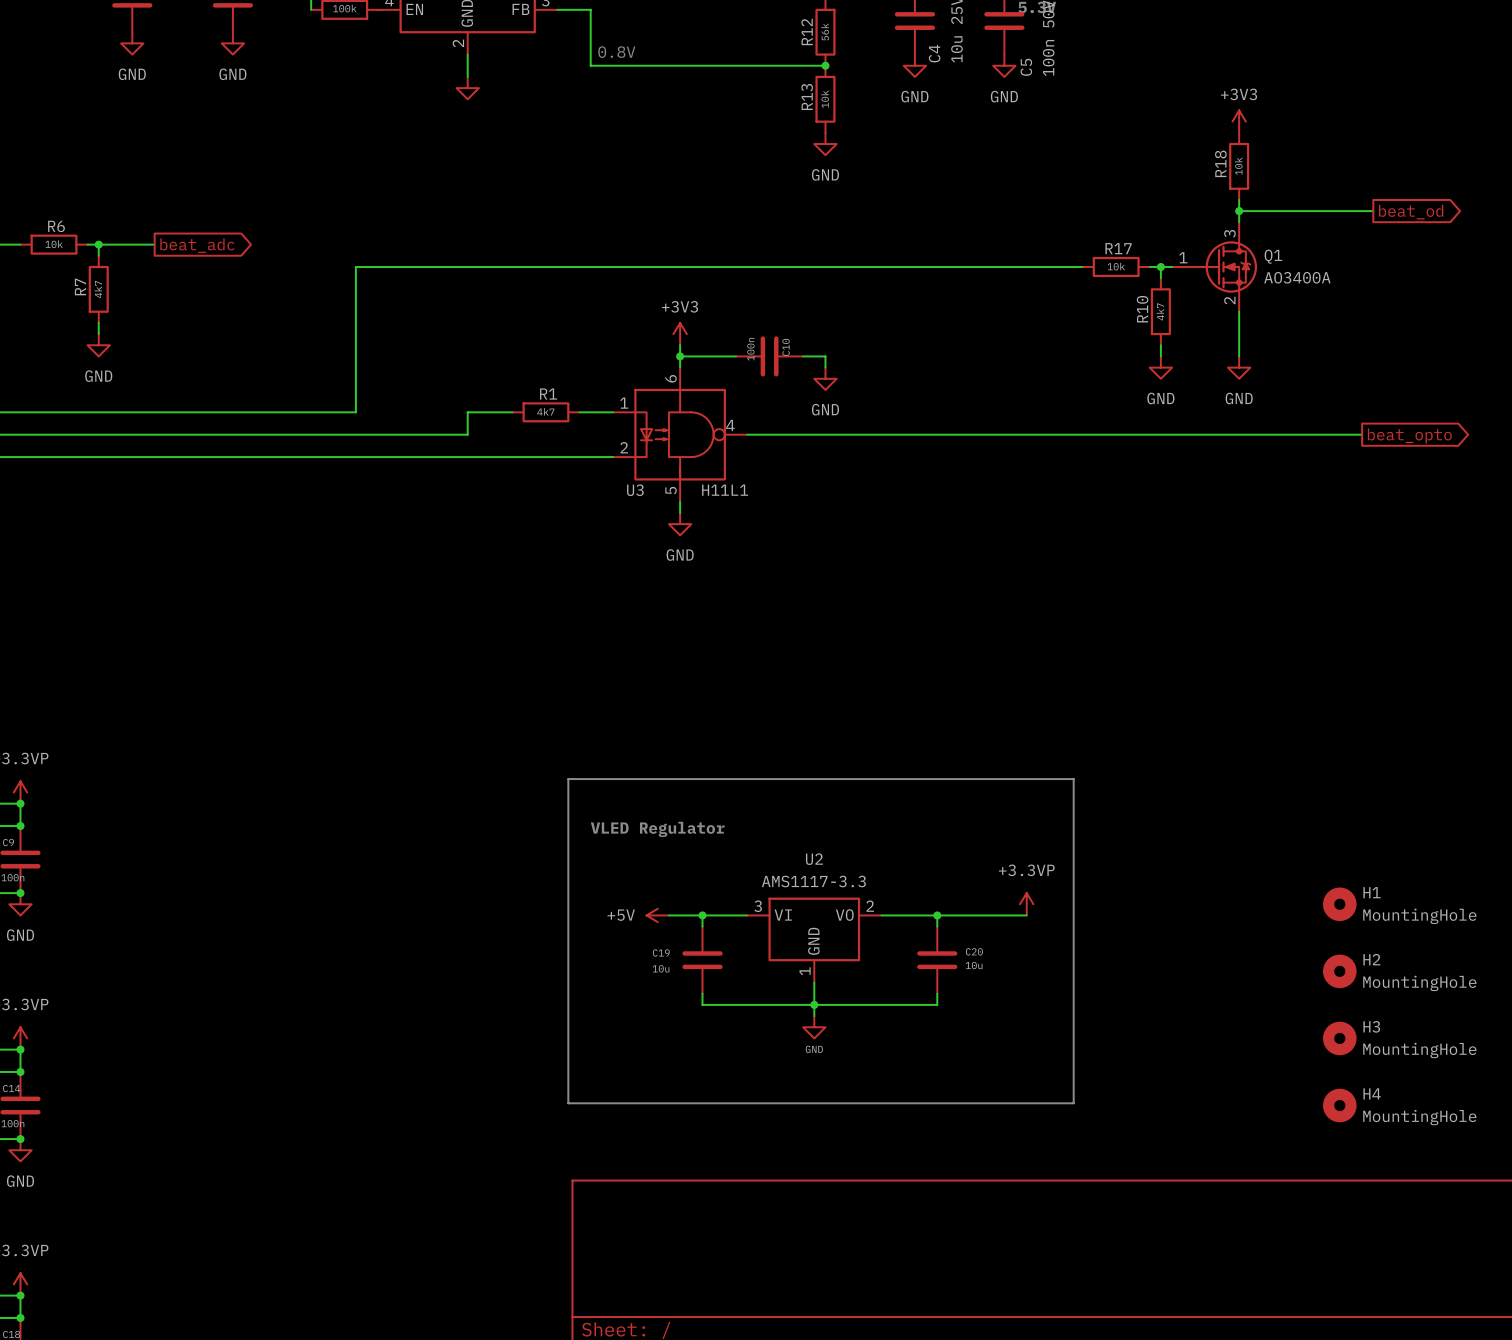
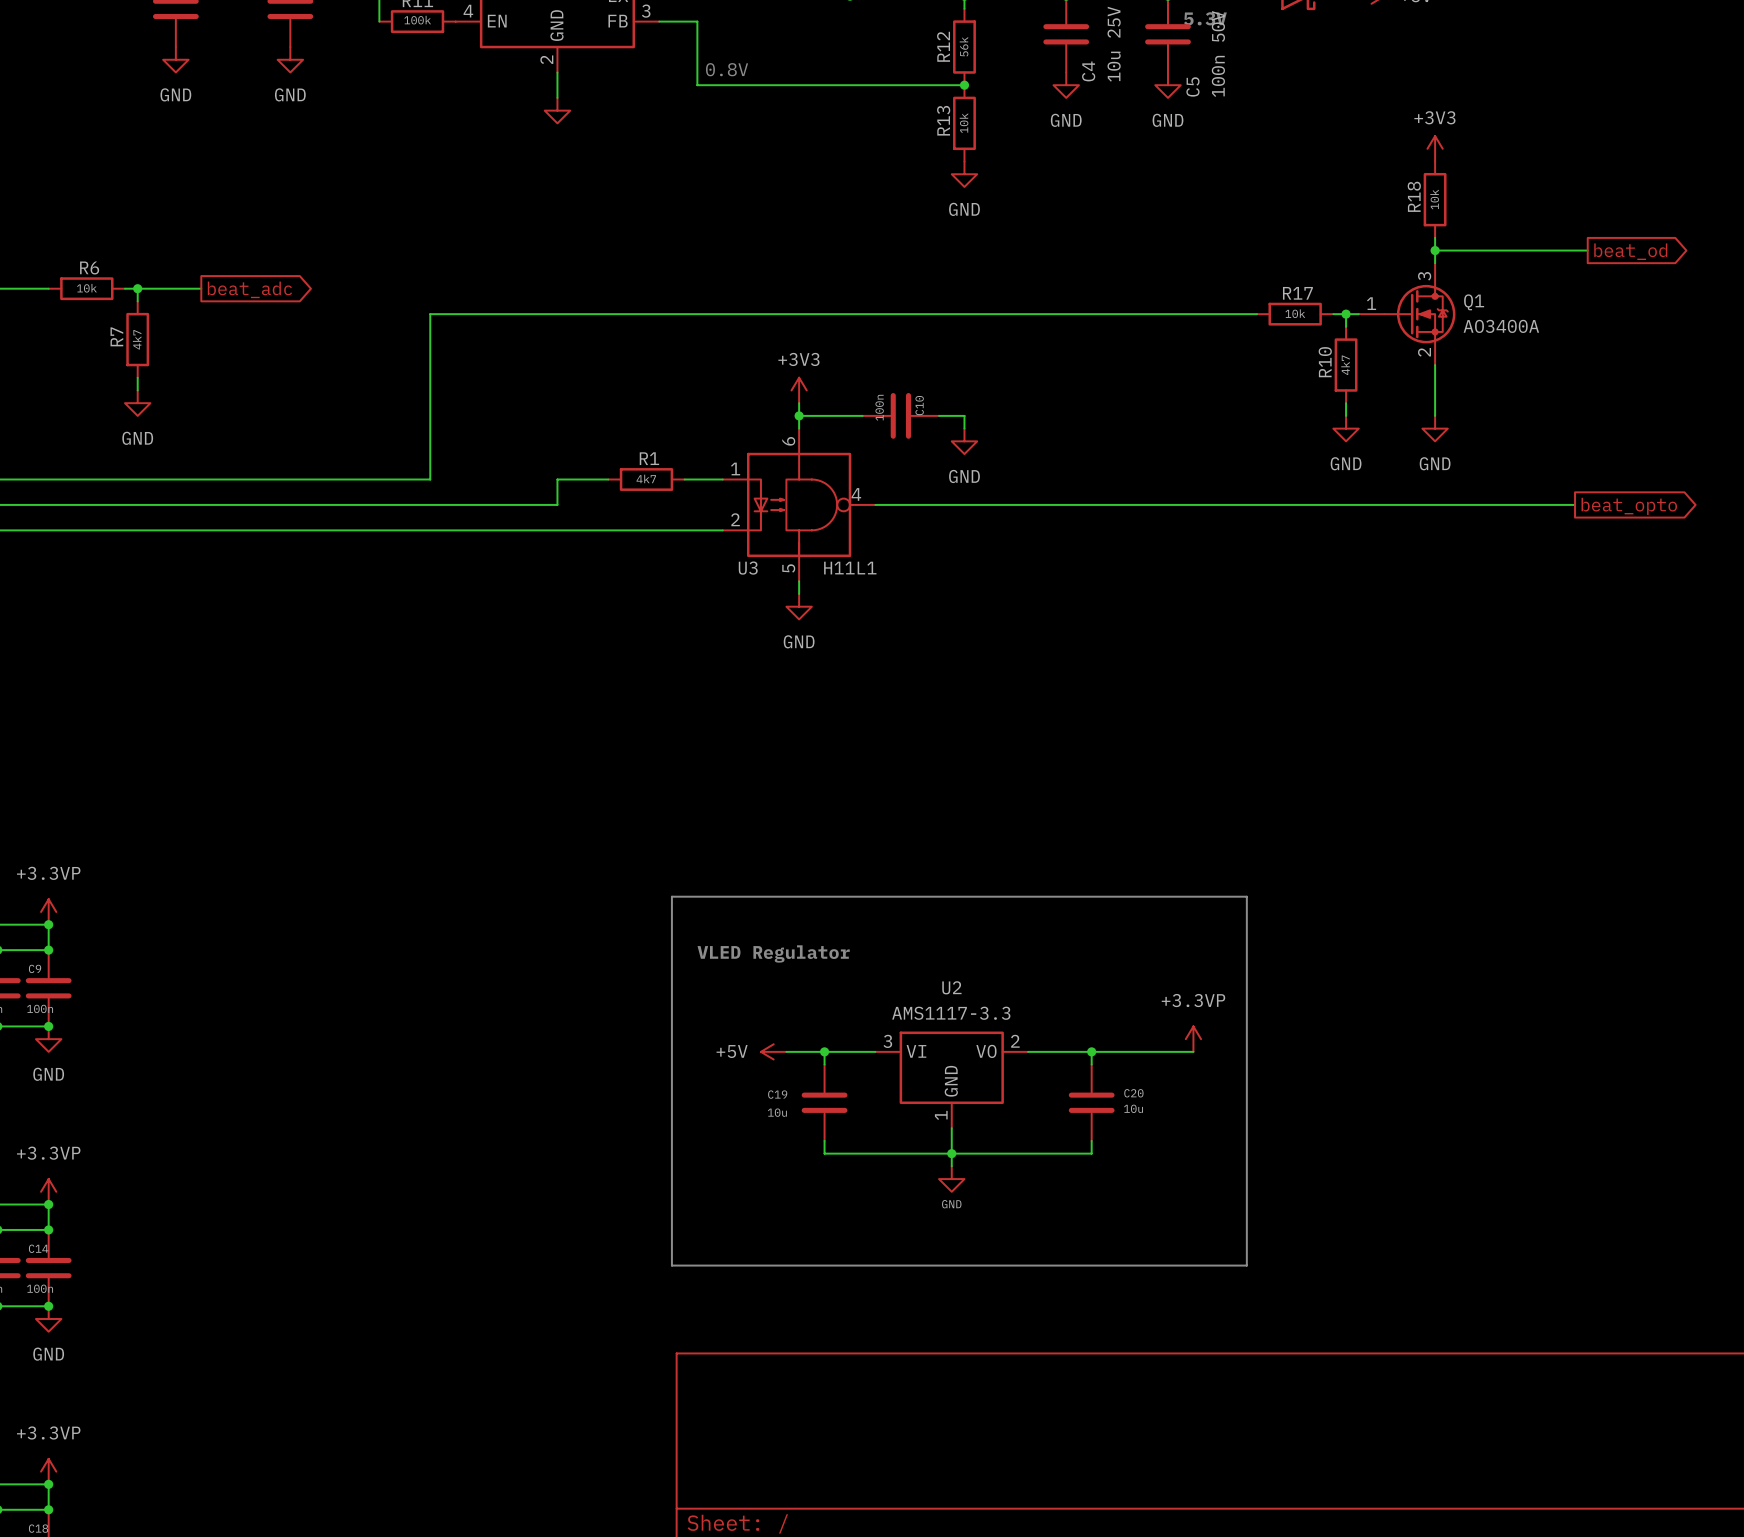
H1: MountingHole (1339, 904) -> none
H2: MountingHole (1339, 971) -> none
H3: MountingHole (1339, 1038) -> none
H4: MountingHole (1339, 1105) -> none

